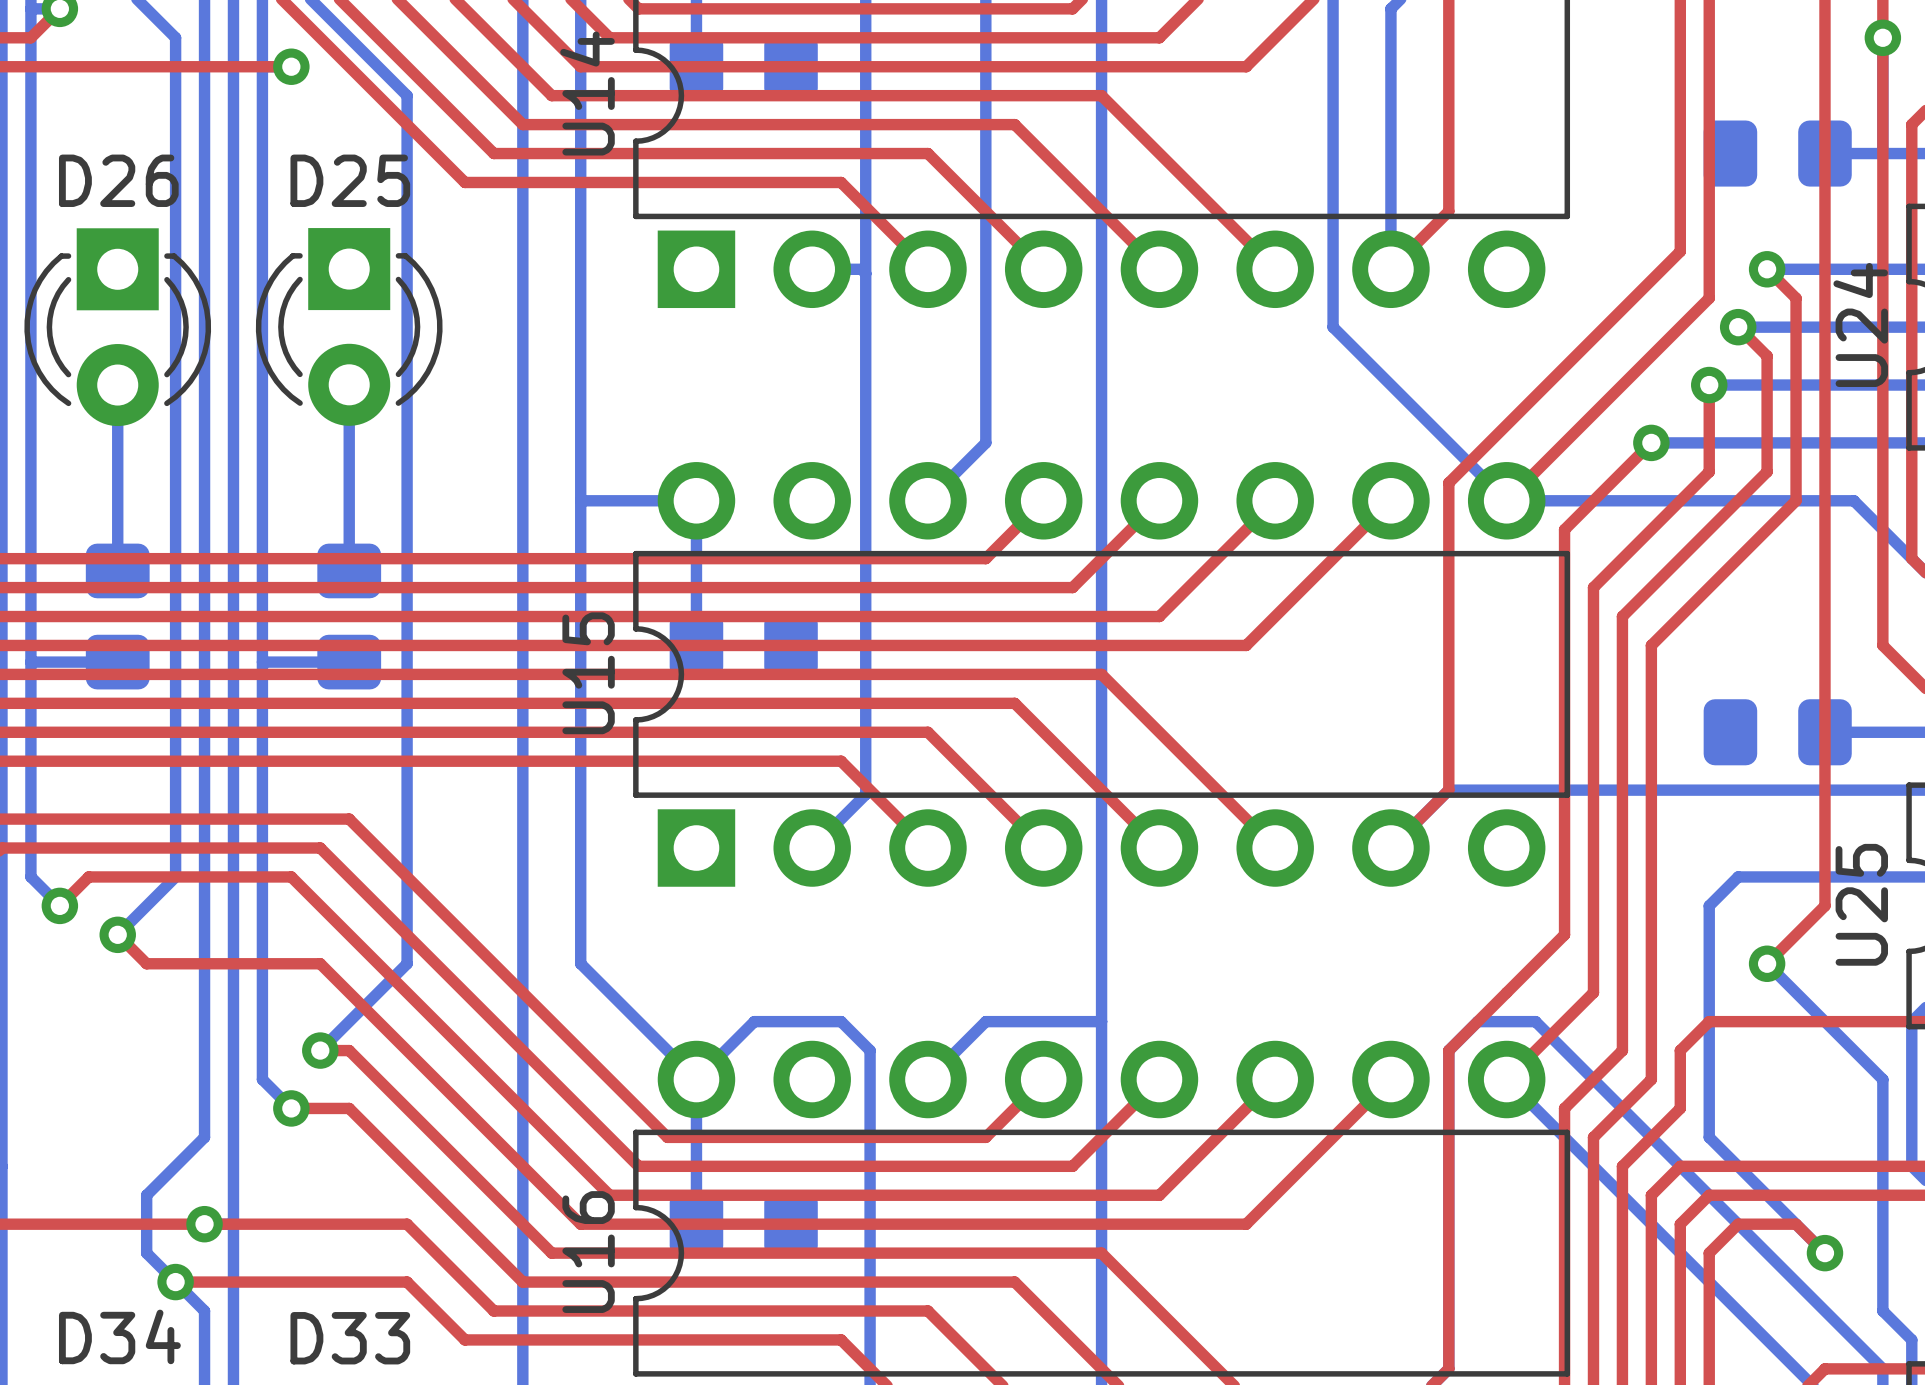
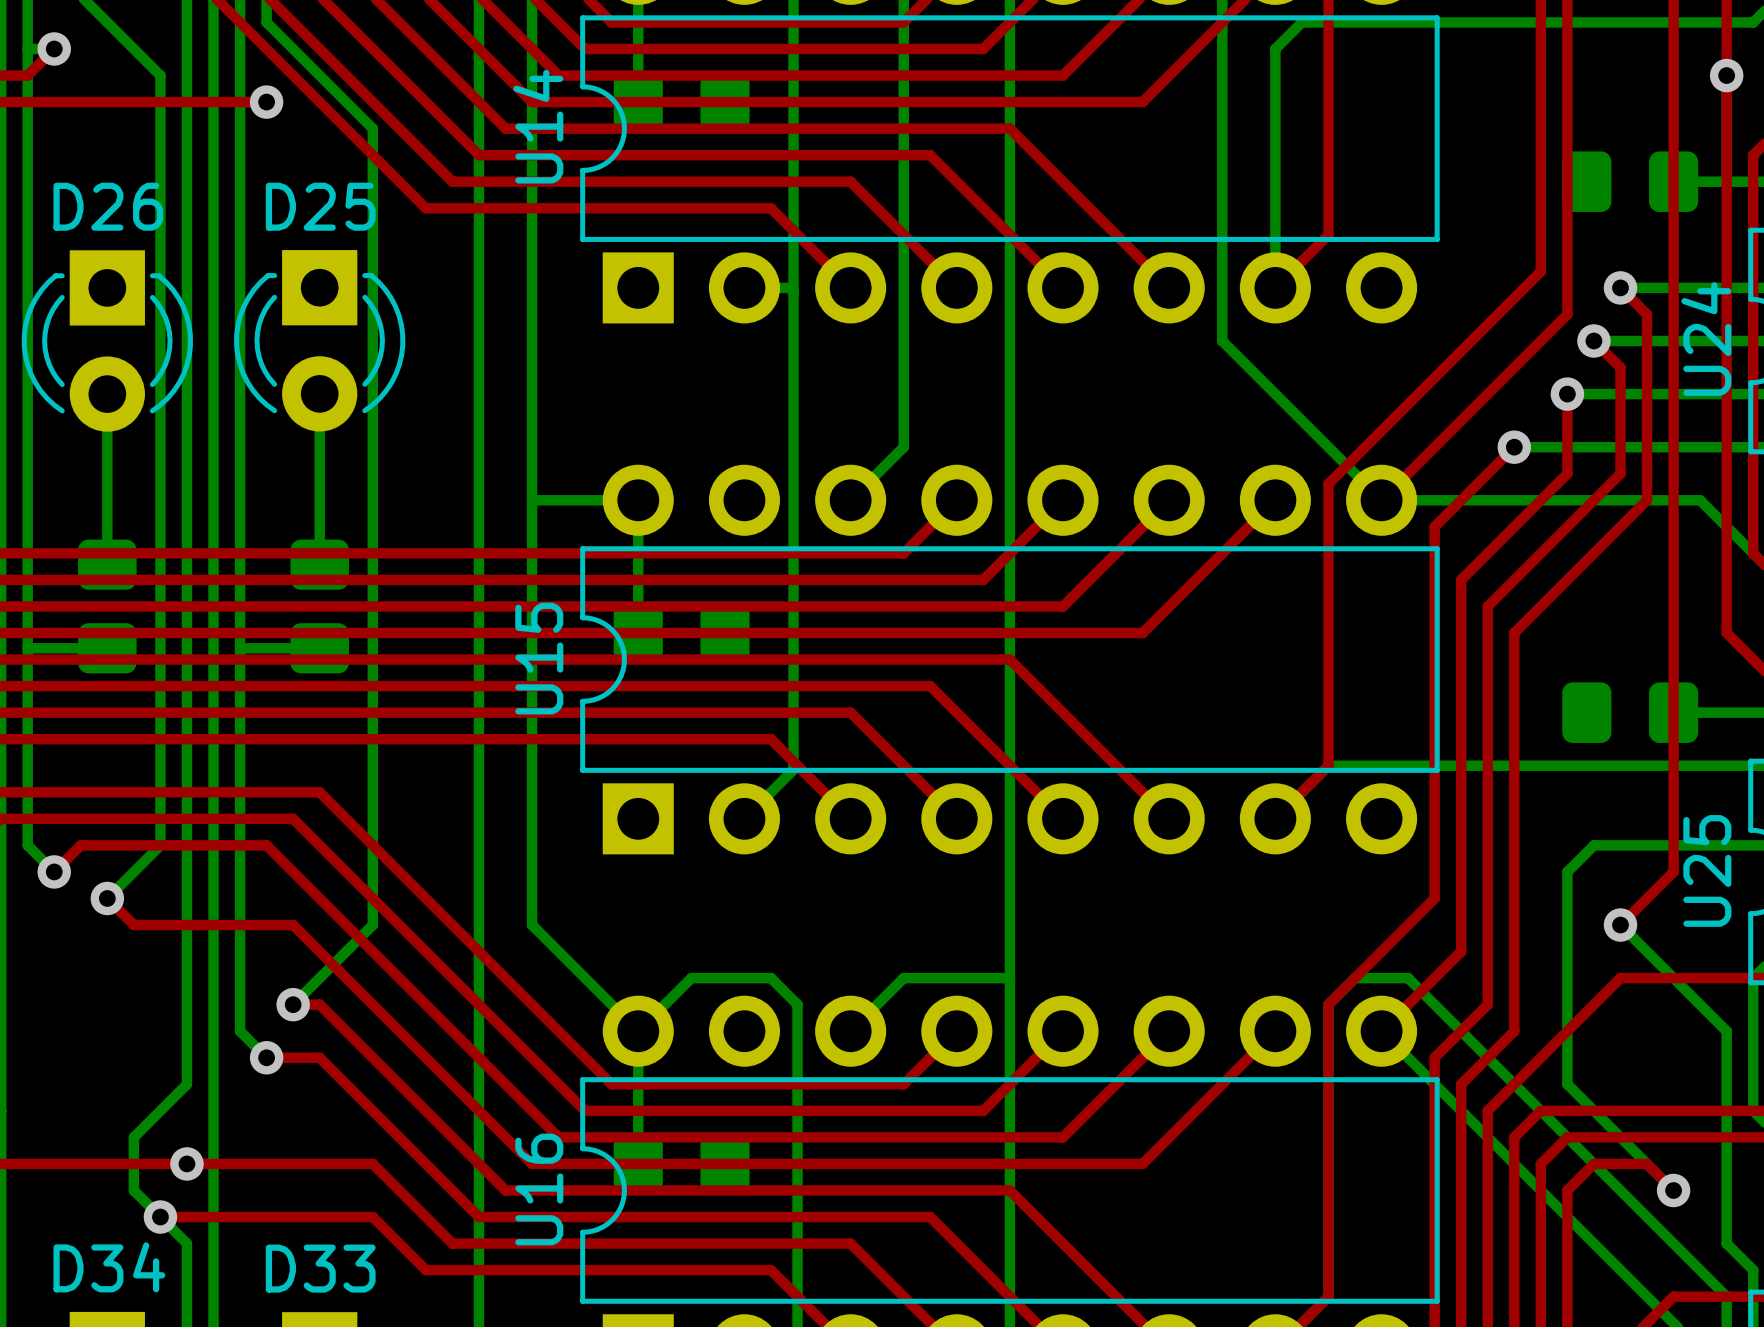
top track: (1767, 1021) (1709, 1021) (1680, 1050) (1680, 1108) -> (1620, 978) (1540, 1057)

